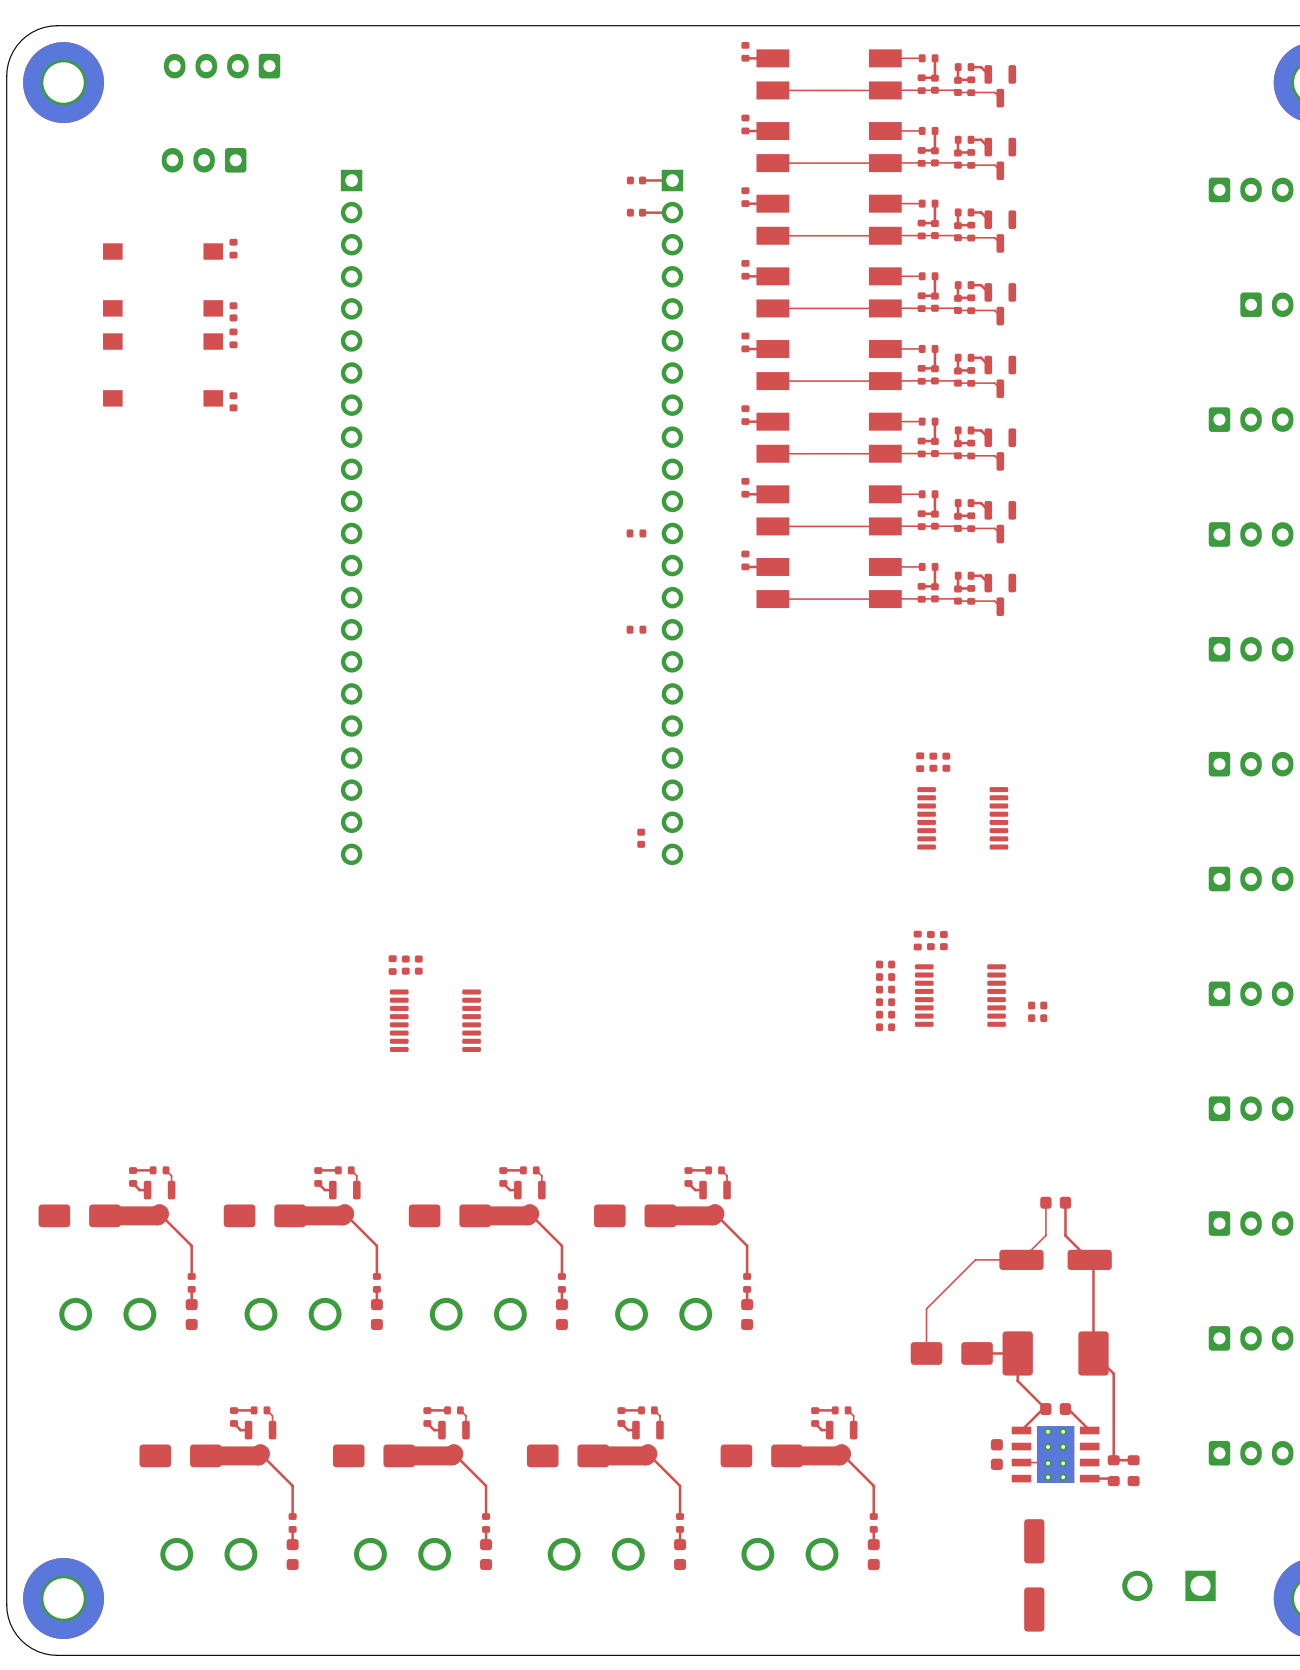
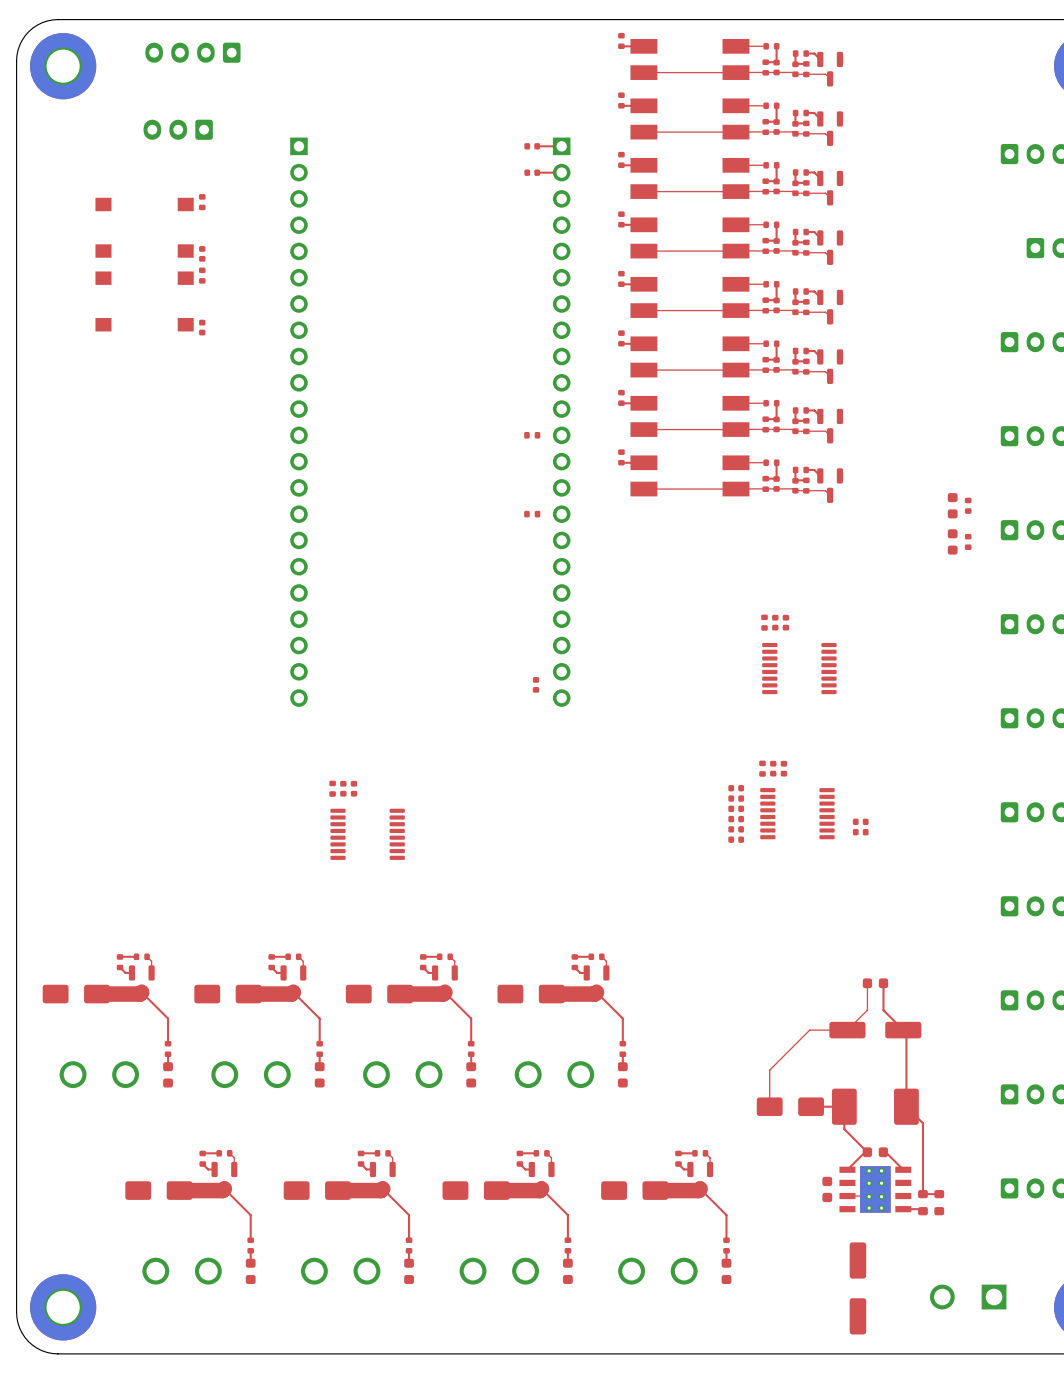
part: none -> (952, 505)
part: none -> (968, 505)
part: none -> (952, 541)
part: none -> (968, 541)

